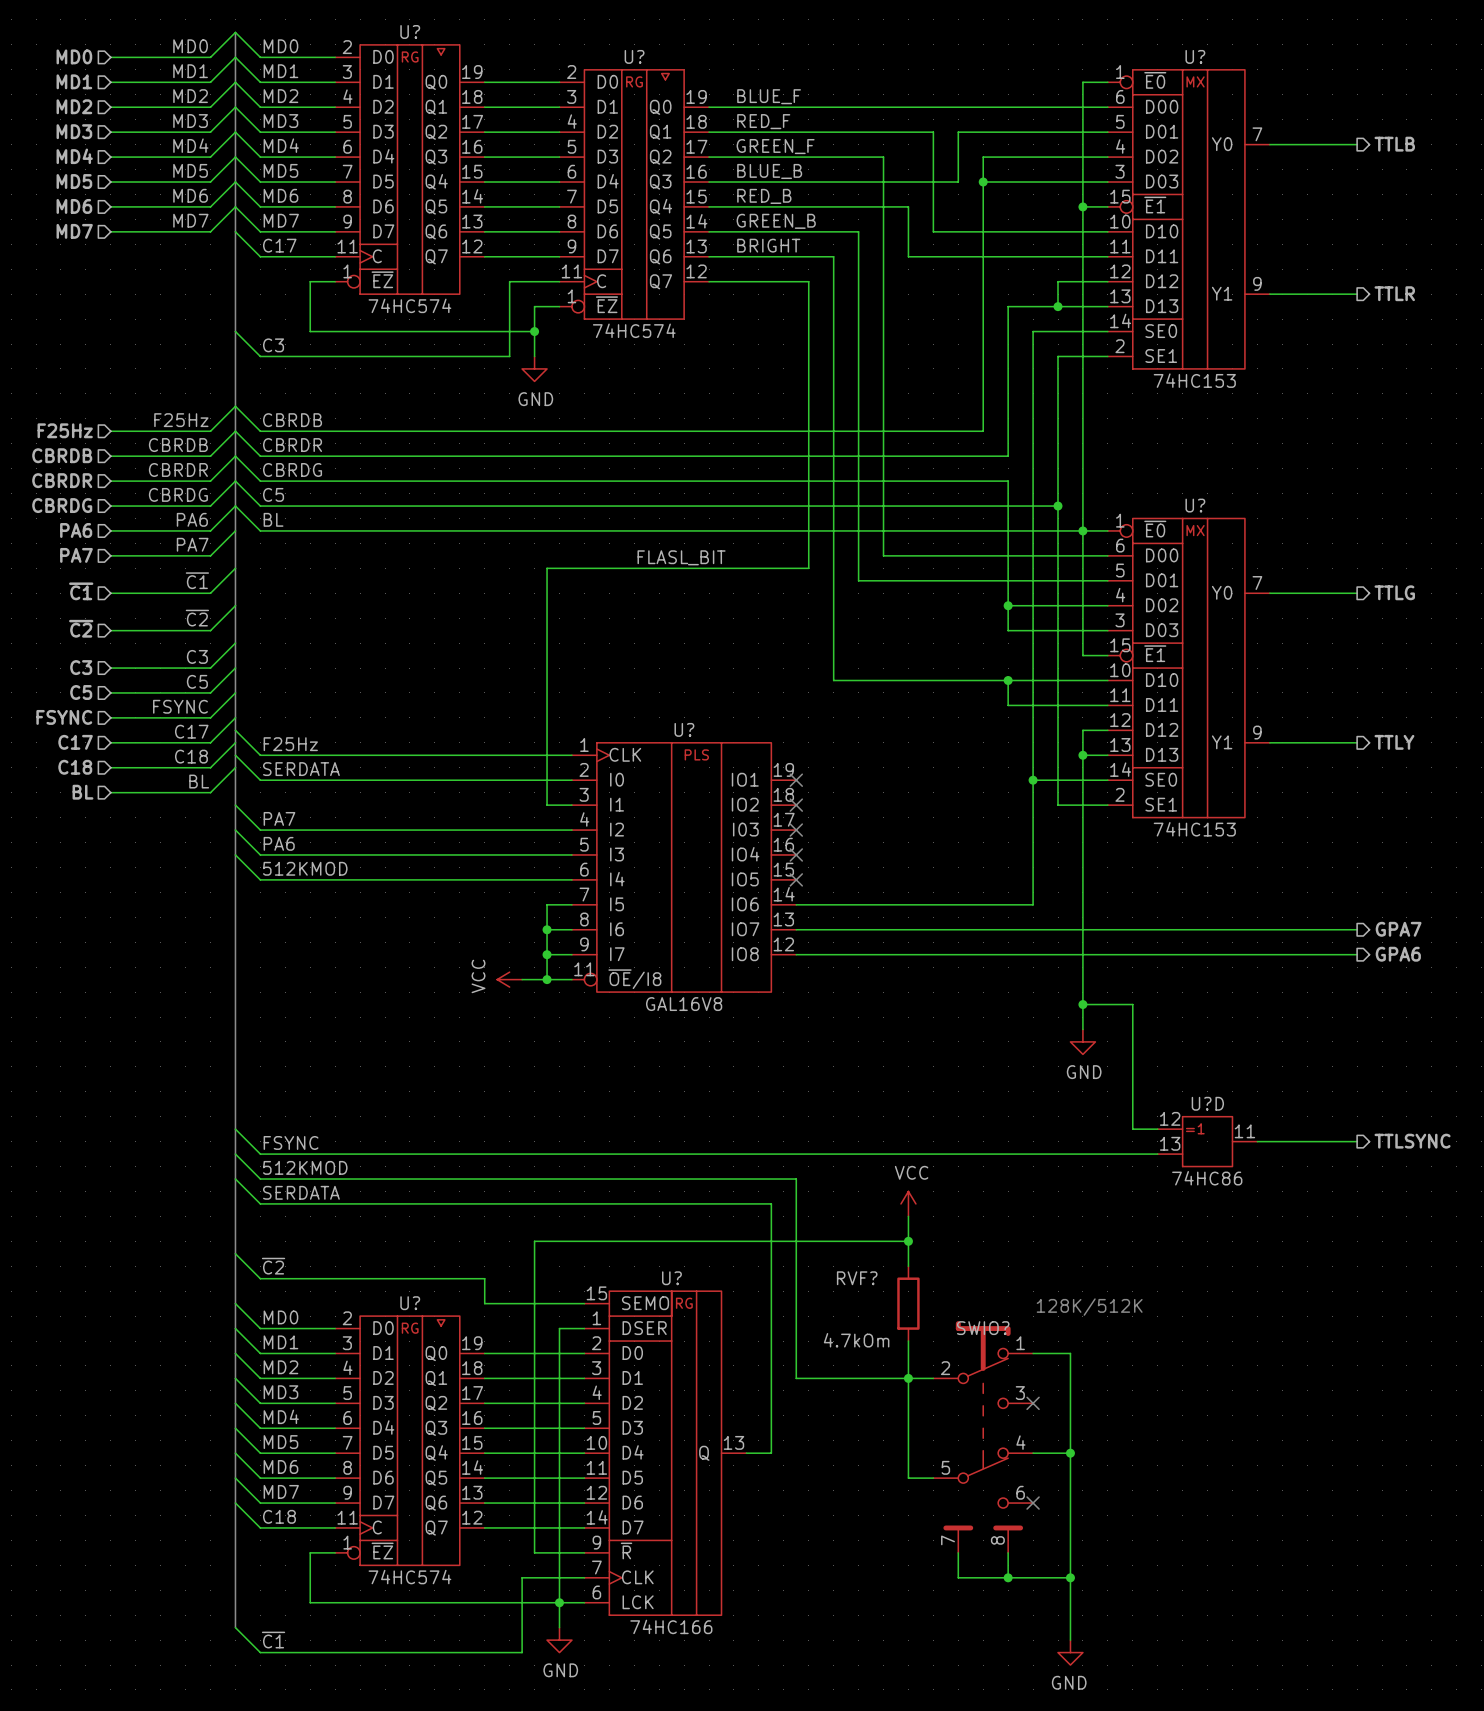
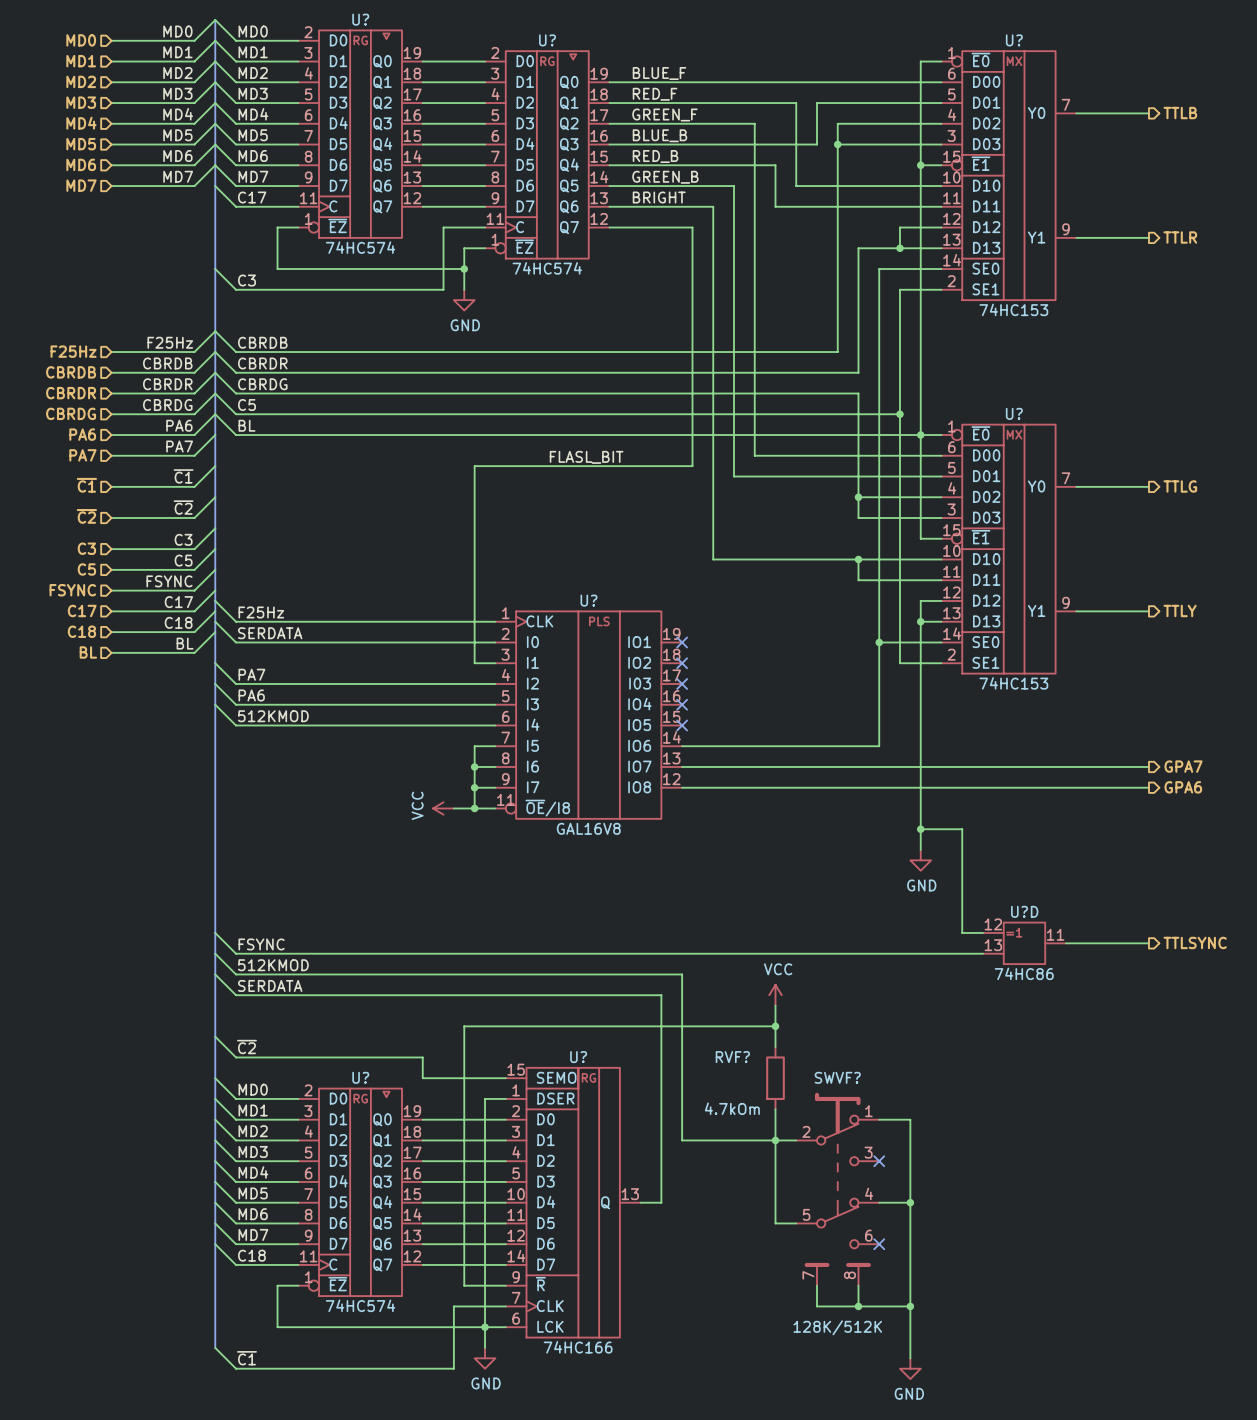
text: 128K/512K (1089, 1307) -> none
SWIO? name: SWIO? (983, 1328) -> SWVF? (837, 1077)
SWIO? value: none -> 128K/512K (837, 1327)

